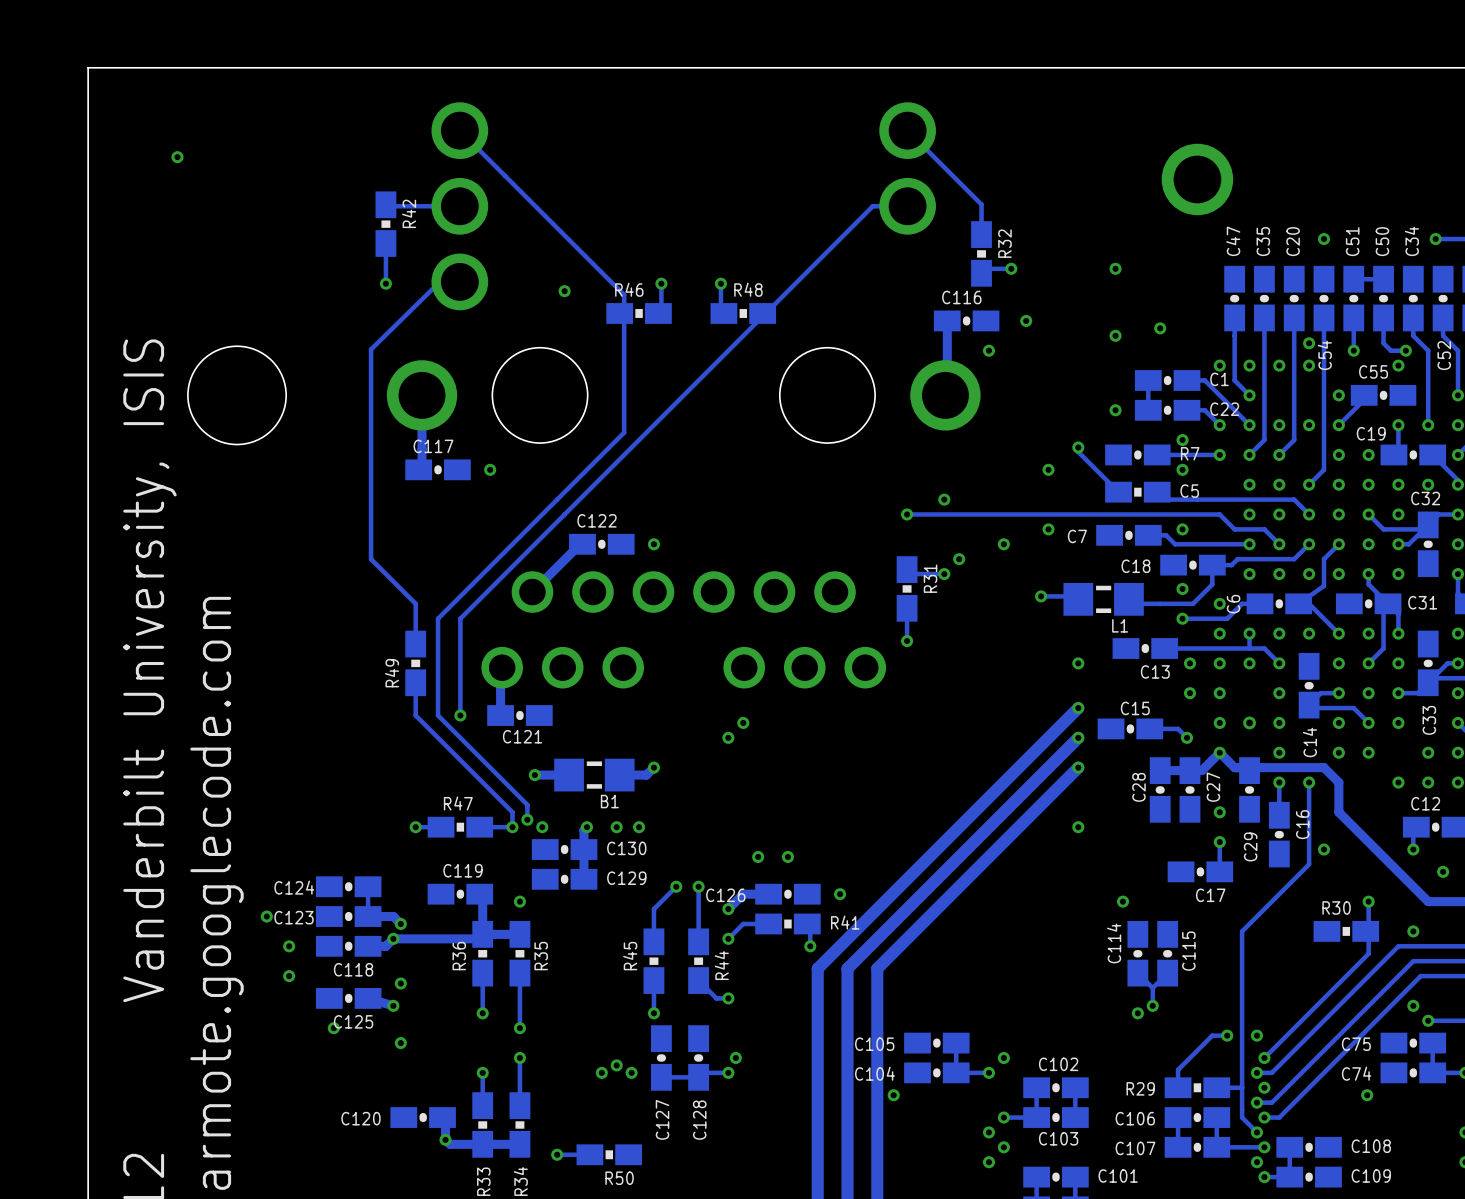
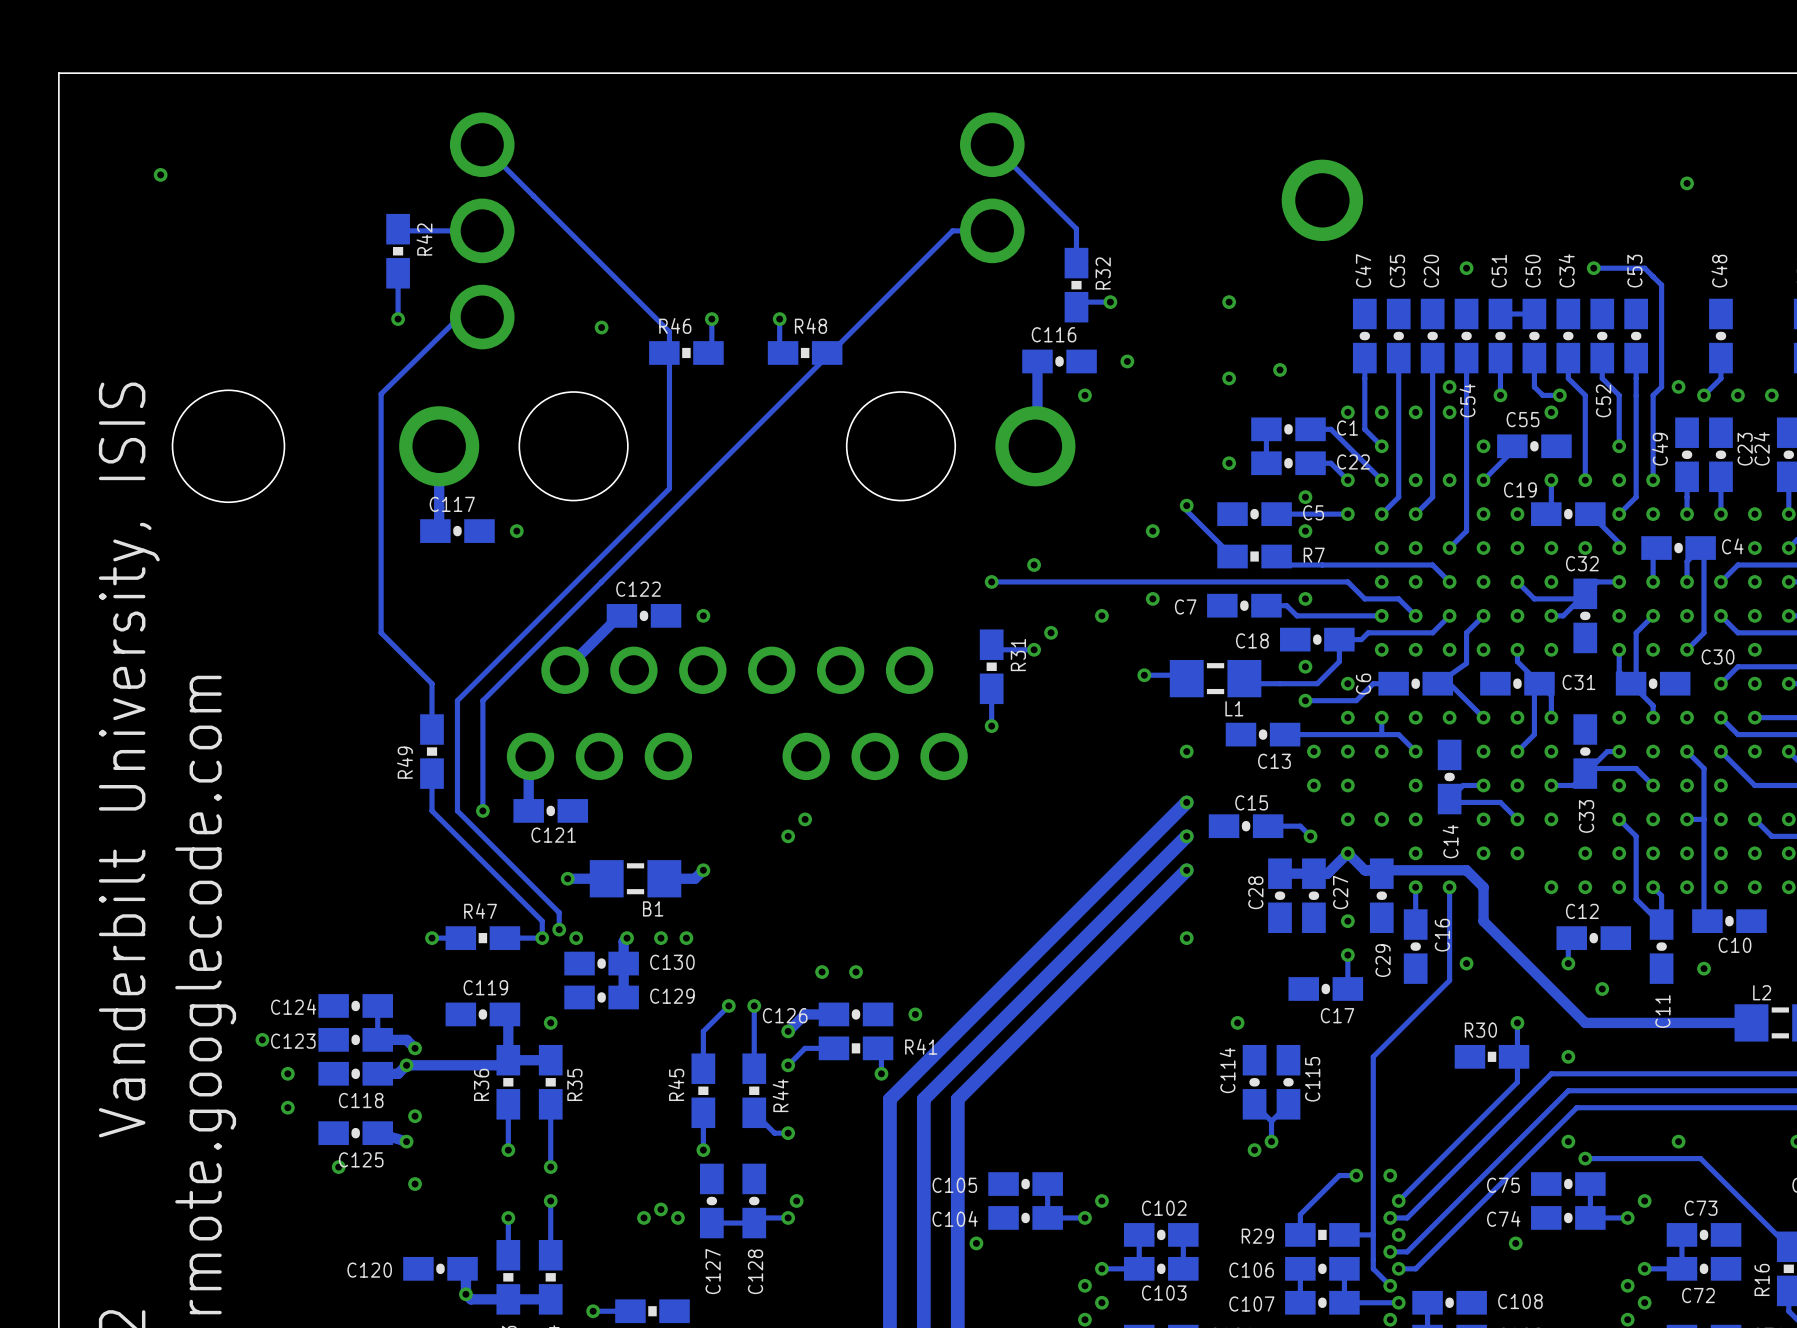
R7 name position: R7 (1190, 453) -> R7 (1314, 555)
C5 name position: C5 (1189, 491) -> C5 (1313, 512)

